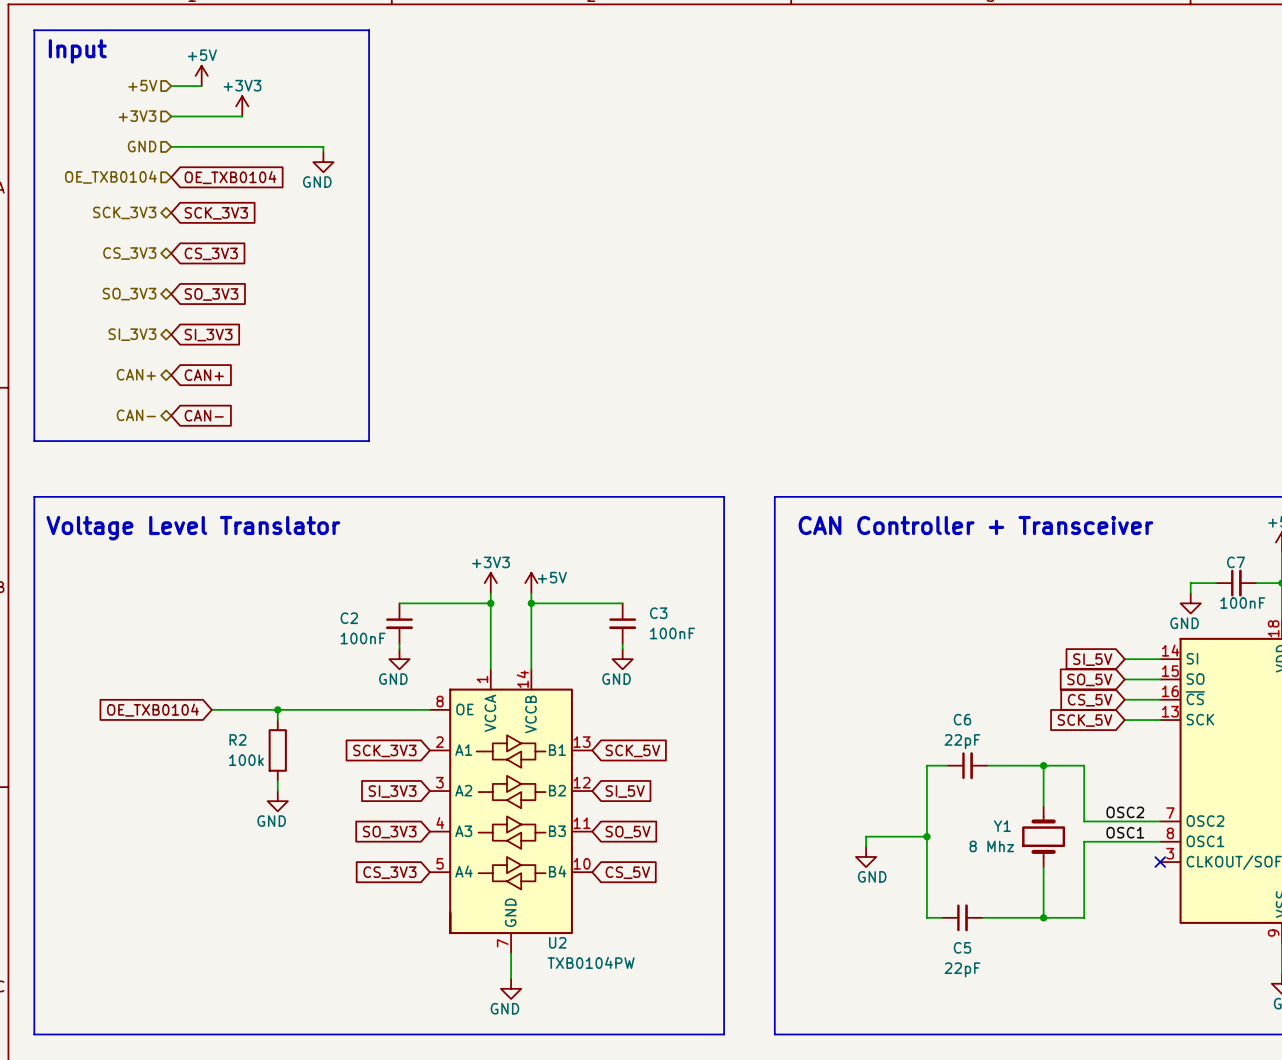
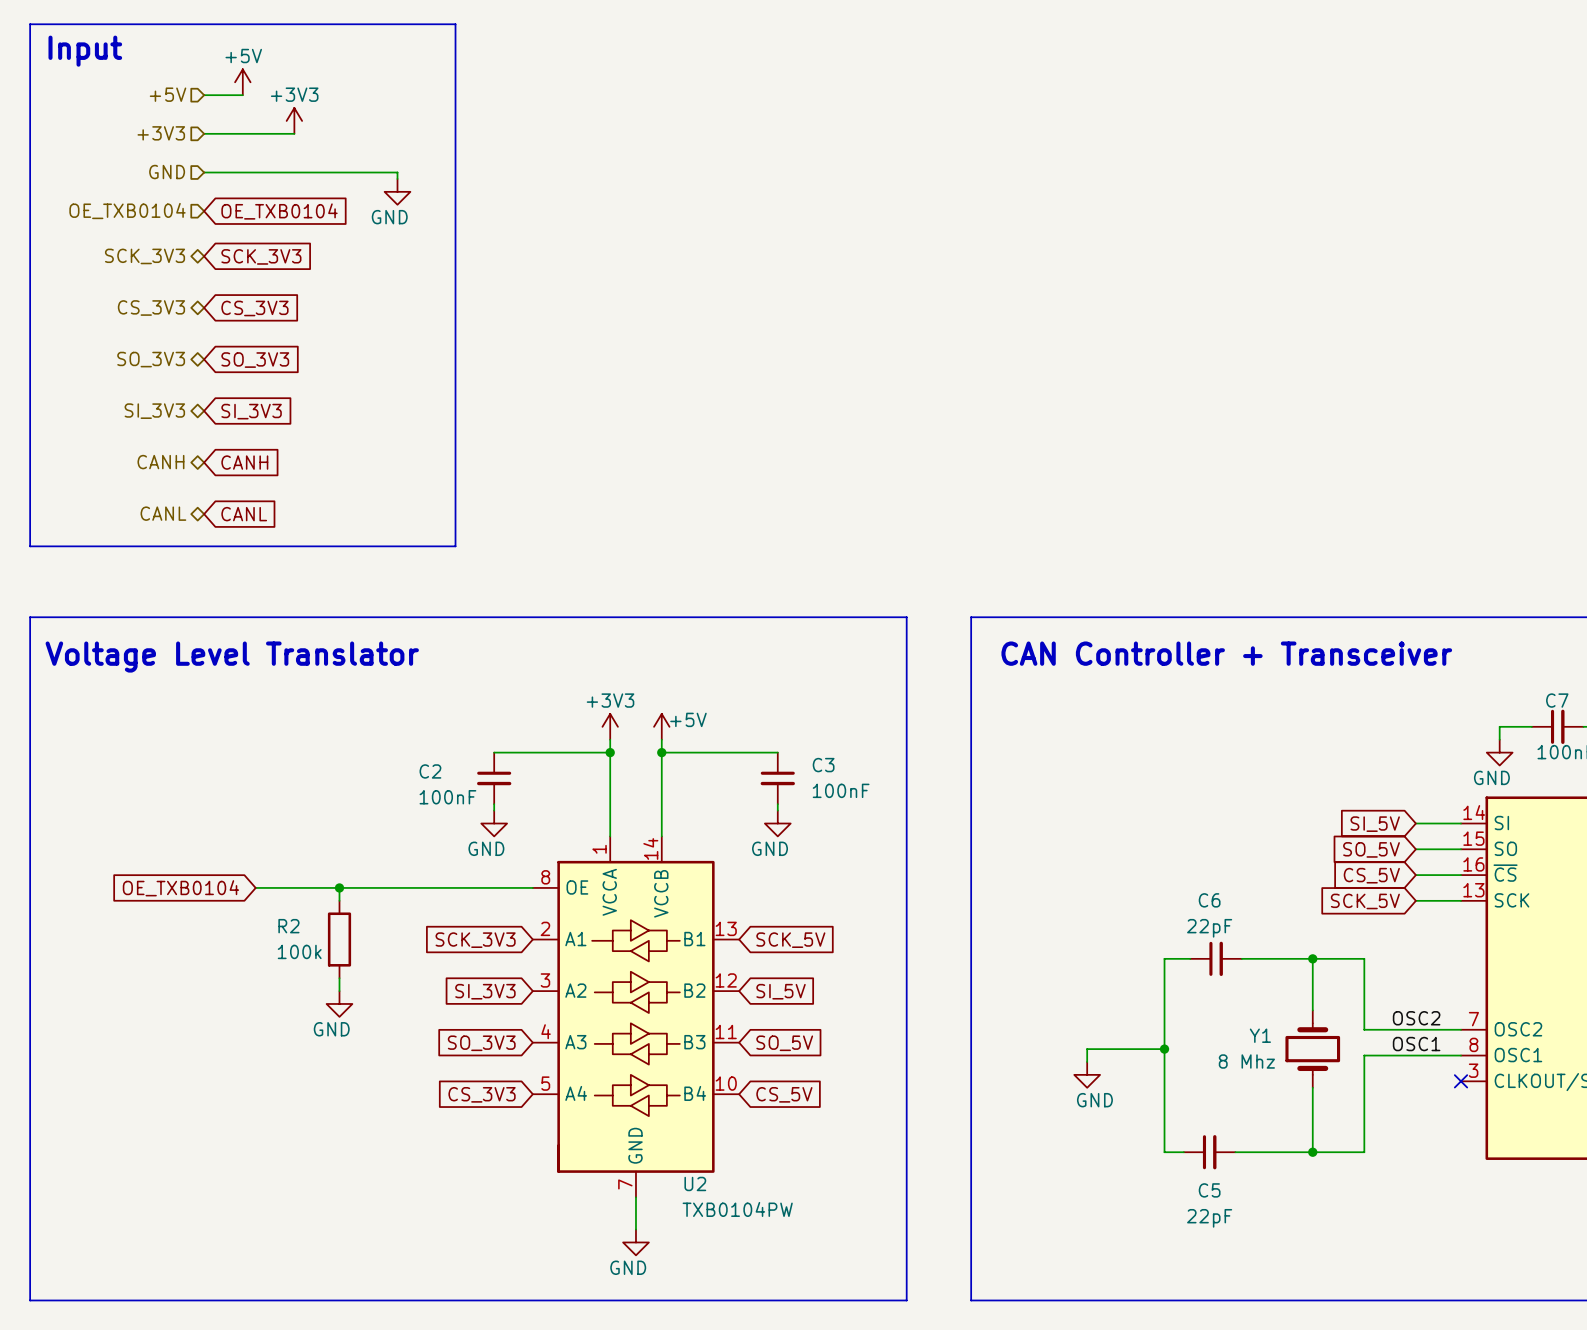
hierarchical label: CAN+ (136, 374) -> CANH (160, 462)
global label: CAN+ (204, 375) -> CANH (244, 462)
hierarchical label: CAN- (136, 415) -> CANL (163, 513)
global label: CAN- (204, 415) -> CANL (244, 514)

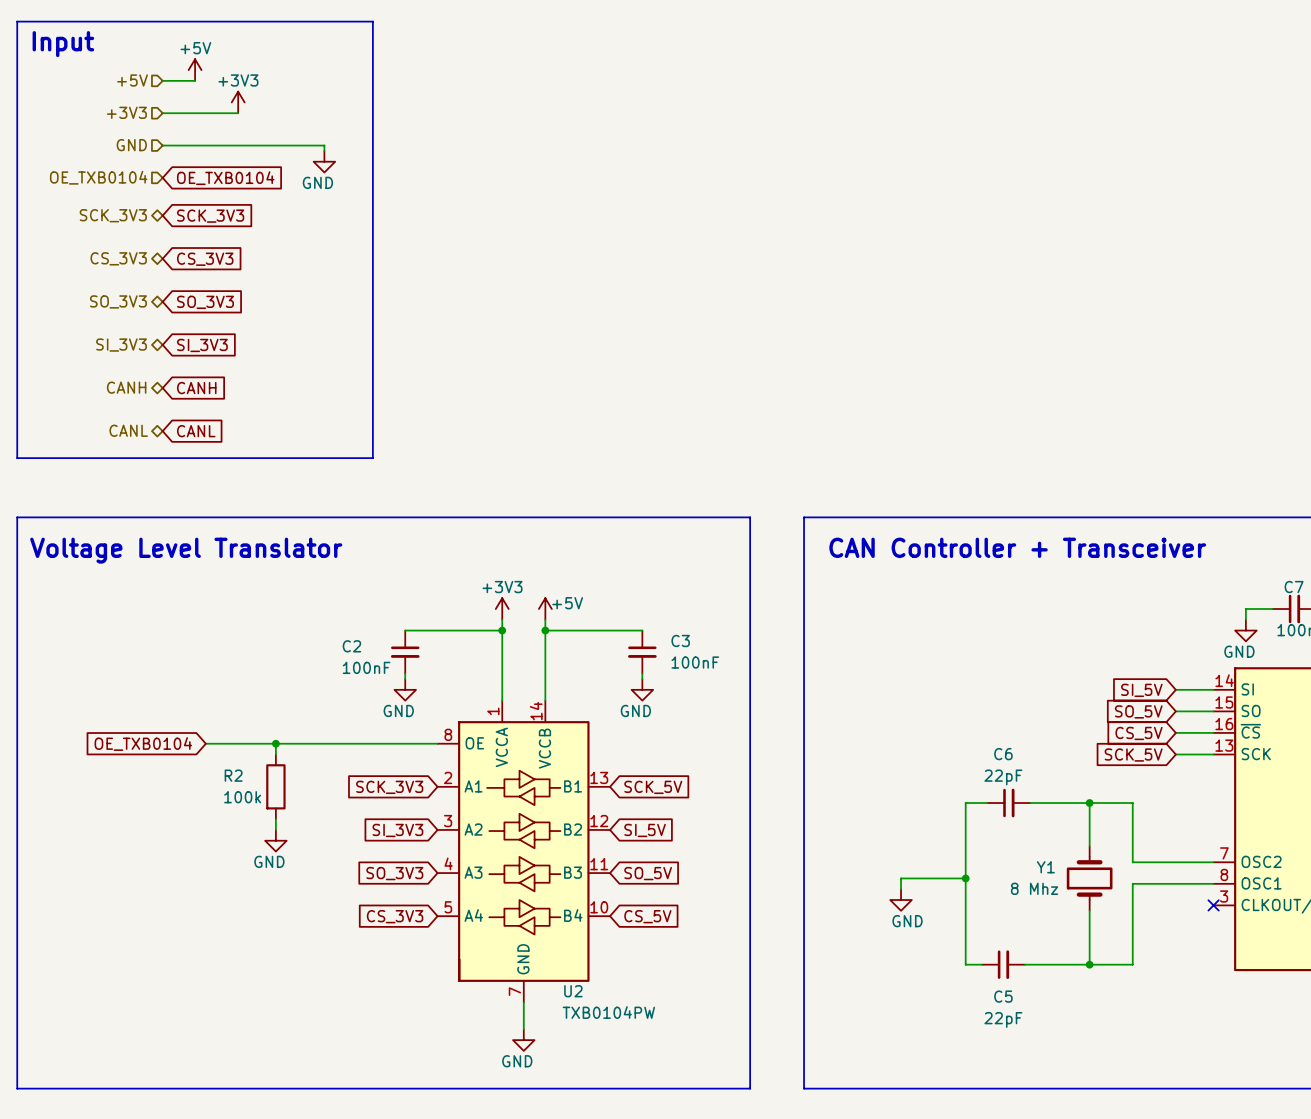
label: OSC2 (1416, 1018) -> none
label: OSC1 (1416, 1044) -> none

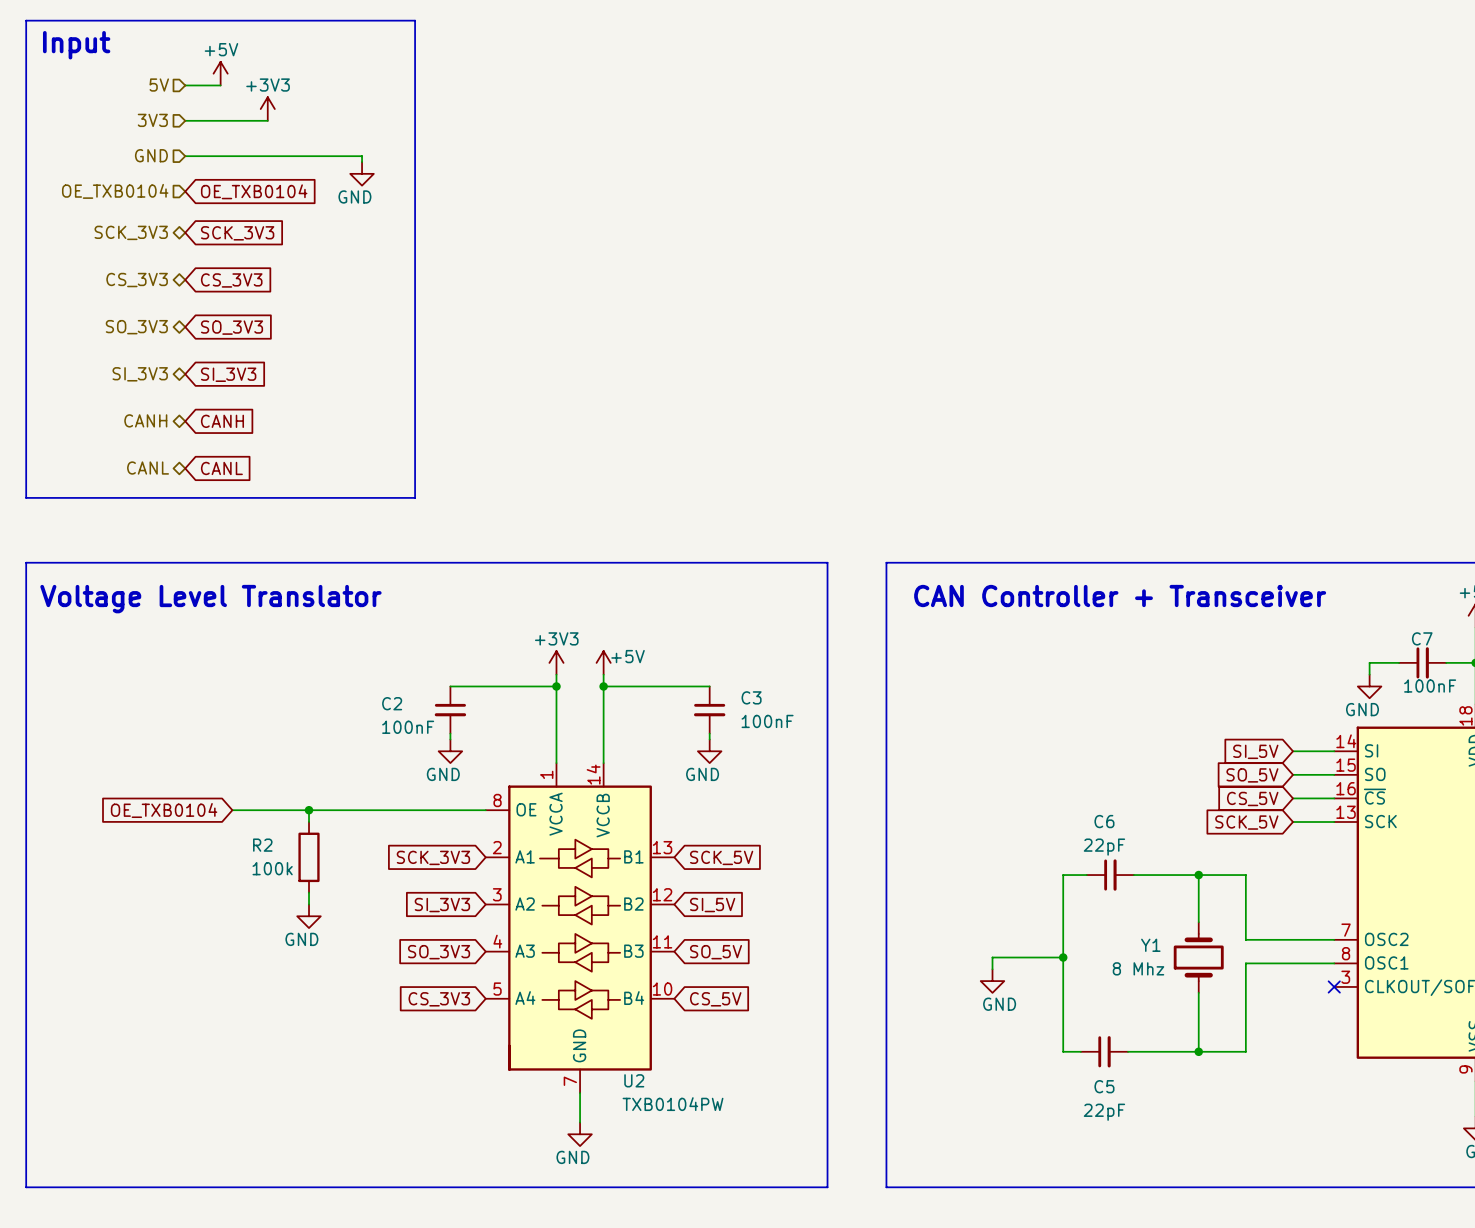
hierarchical label: +5V (132, 80) -> 5V (159, 85)
hierarchical label: +3V3 (126, 112) -> 3V3 (152, 120)

